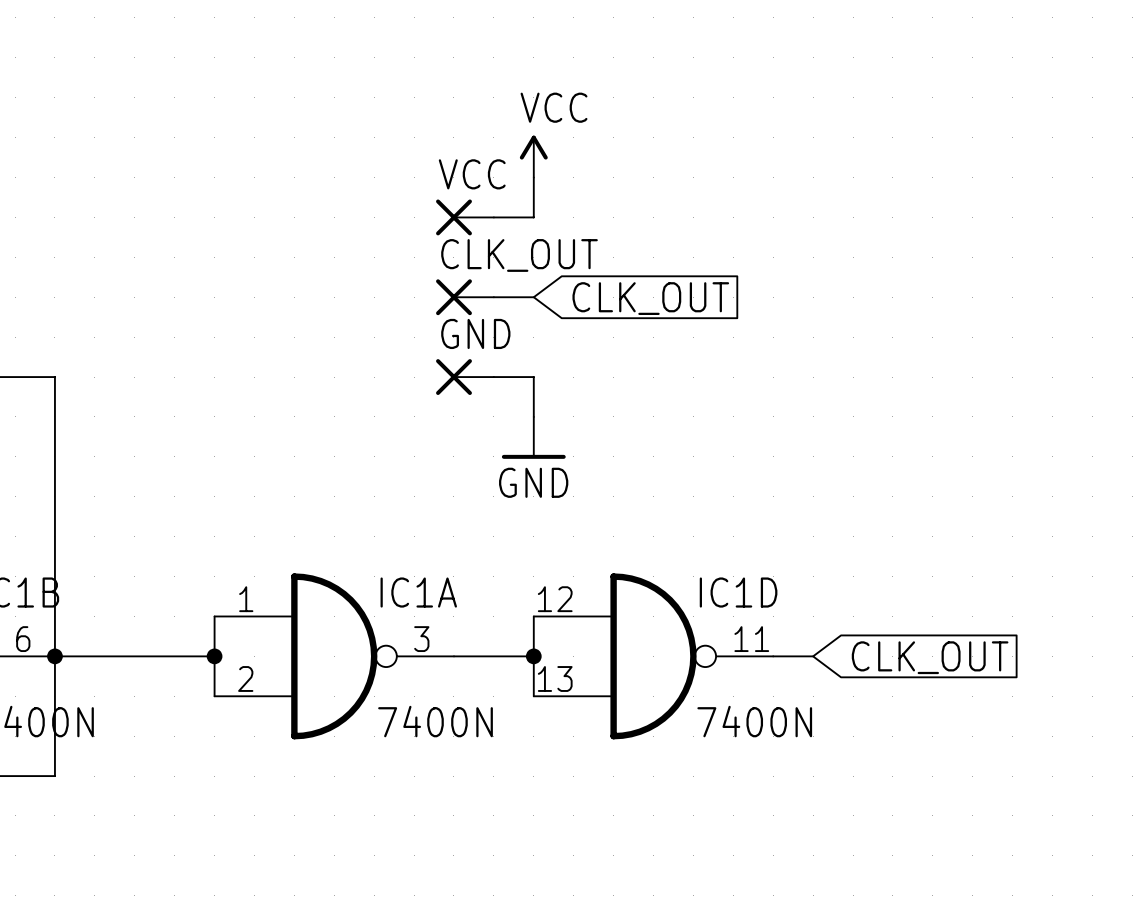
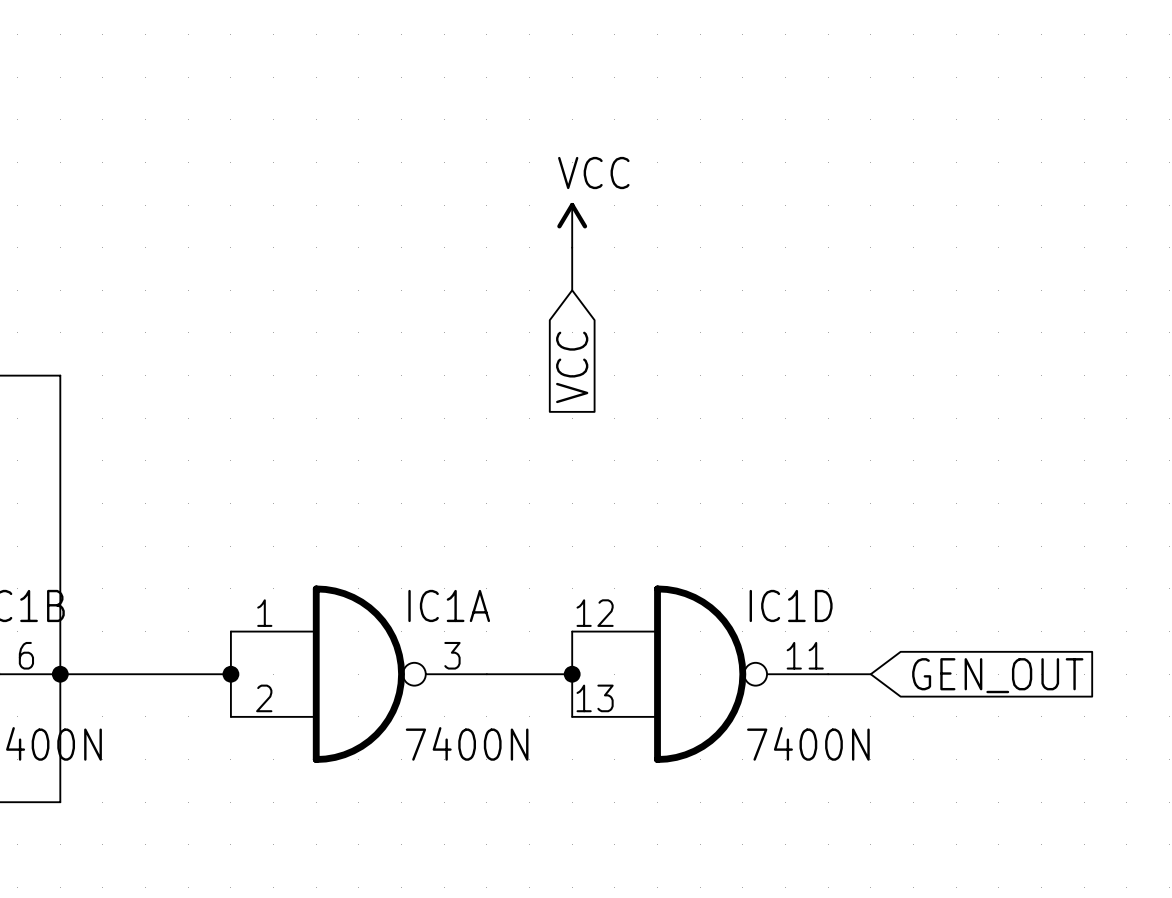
power symbol position: VCC (533, 156) -> VCC (572, 225)
wire: (533, 177) (533, 217) (493, 217) -> none
VCC: (464, 217) -> none
CLK_OUT: (464, 297) -> none
wire: (493, 297) (533, 297) -> (572, 247) (572, 290)
global label: CLK_OUT (650, 298) -> VCC (572, 367)
GND: (464, 377) -> none
wire: (493, 377) (533, 377) (533, 416) -> none
power symbol: GND (533, 437) -> none
global label: CLK_OUT (930, 657) -> GEN_OUT (997, 675)

